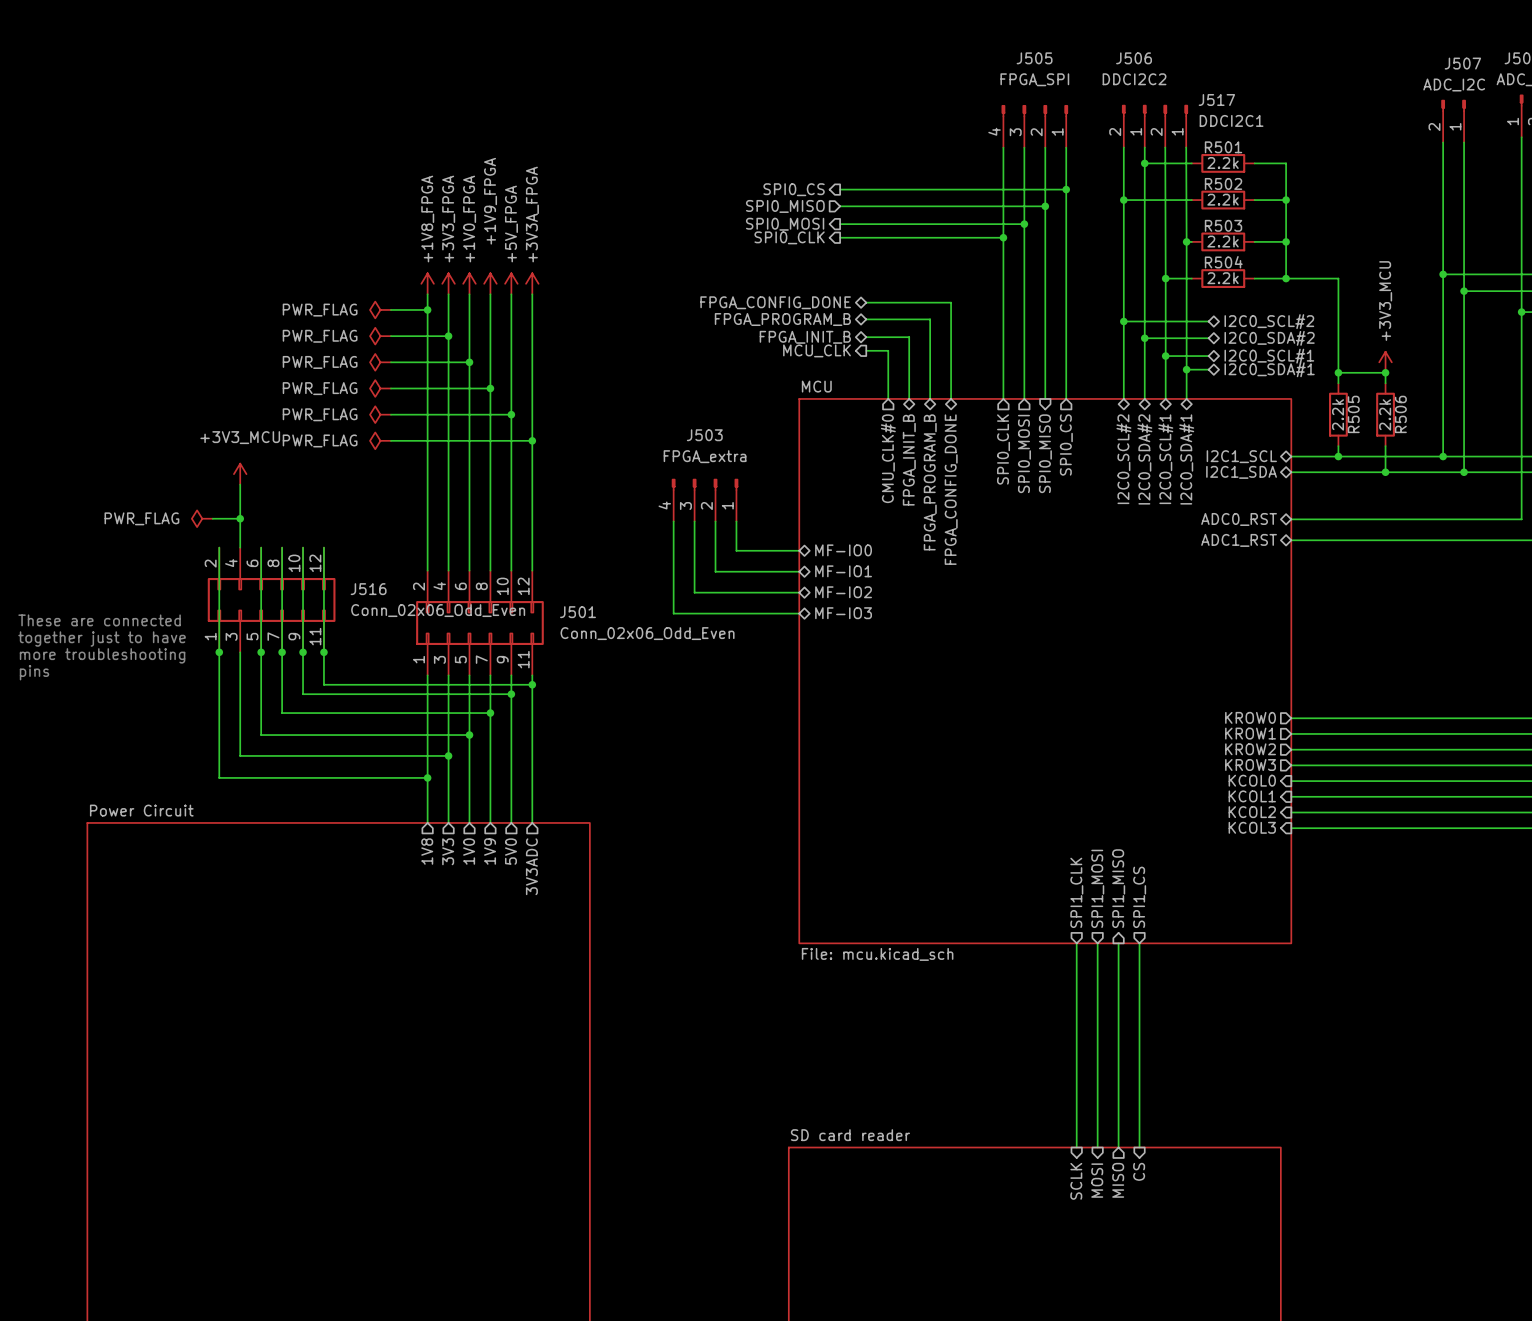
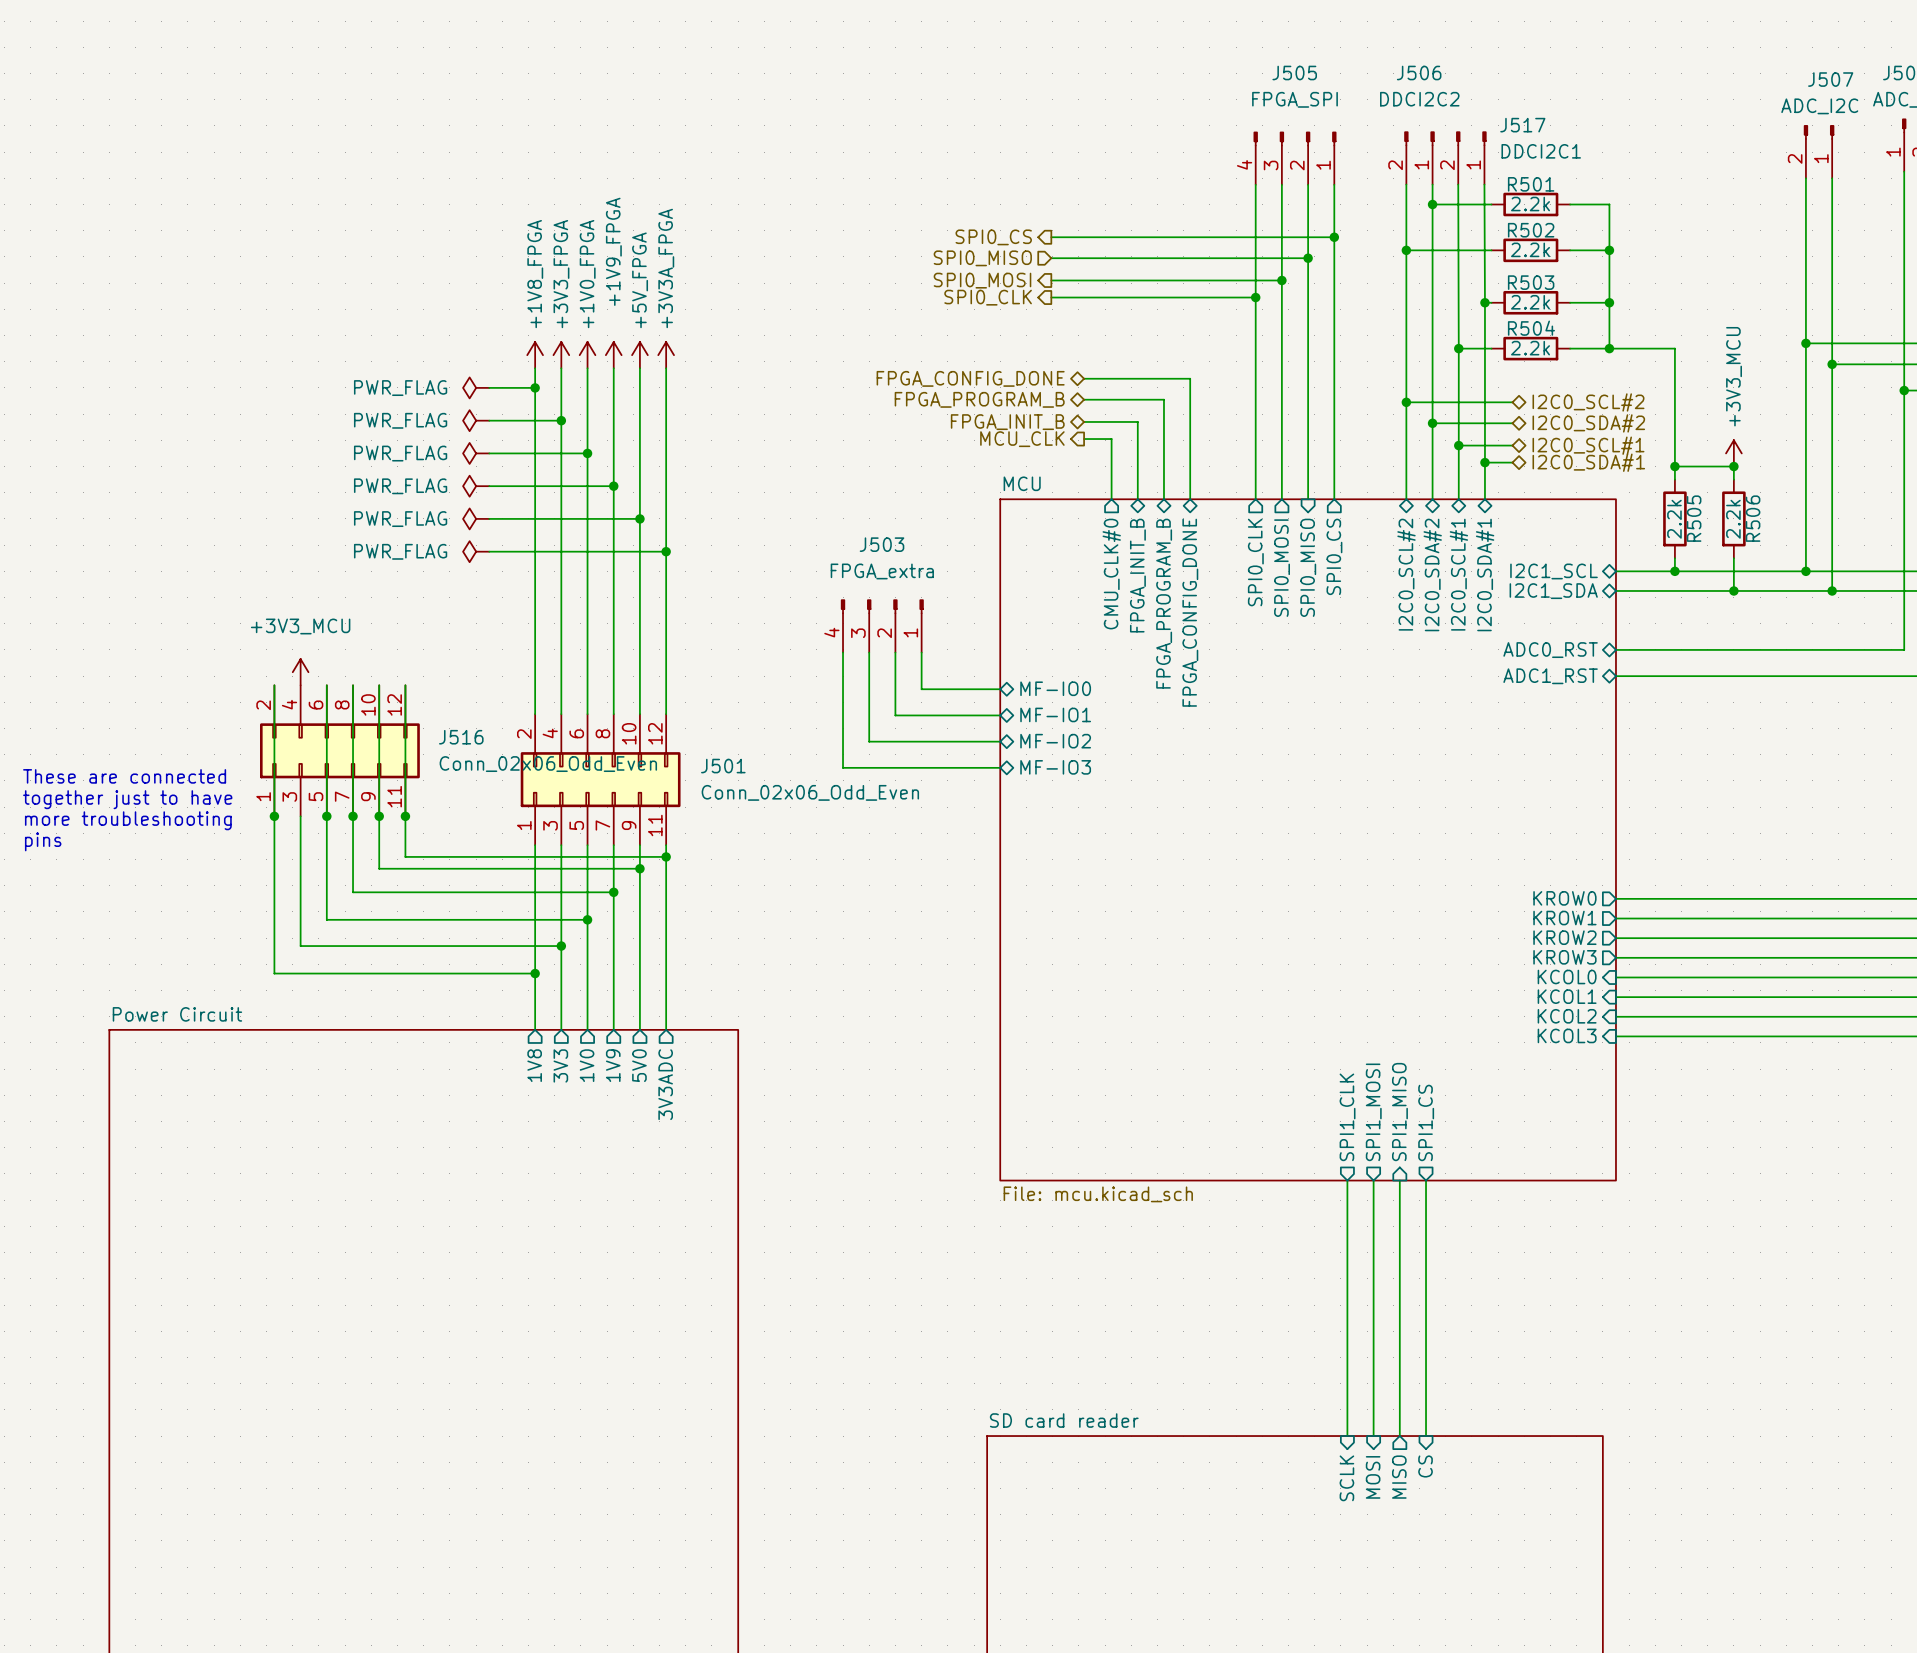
power symbol position: +3V3_MCU (240, 474) -> +3V3_MCU (300, 672)
wire: (240, 484) (240, 547) -> none
power symbol: PWR_FLAG (202, 518) -> none
wire: (212, 518) (240, 518) -> none
junction: (240, 518) -> none

